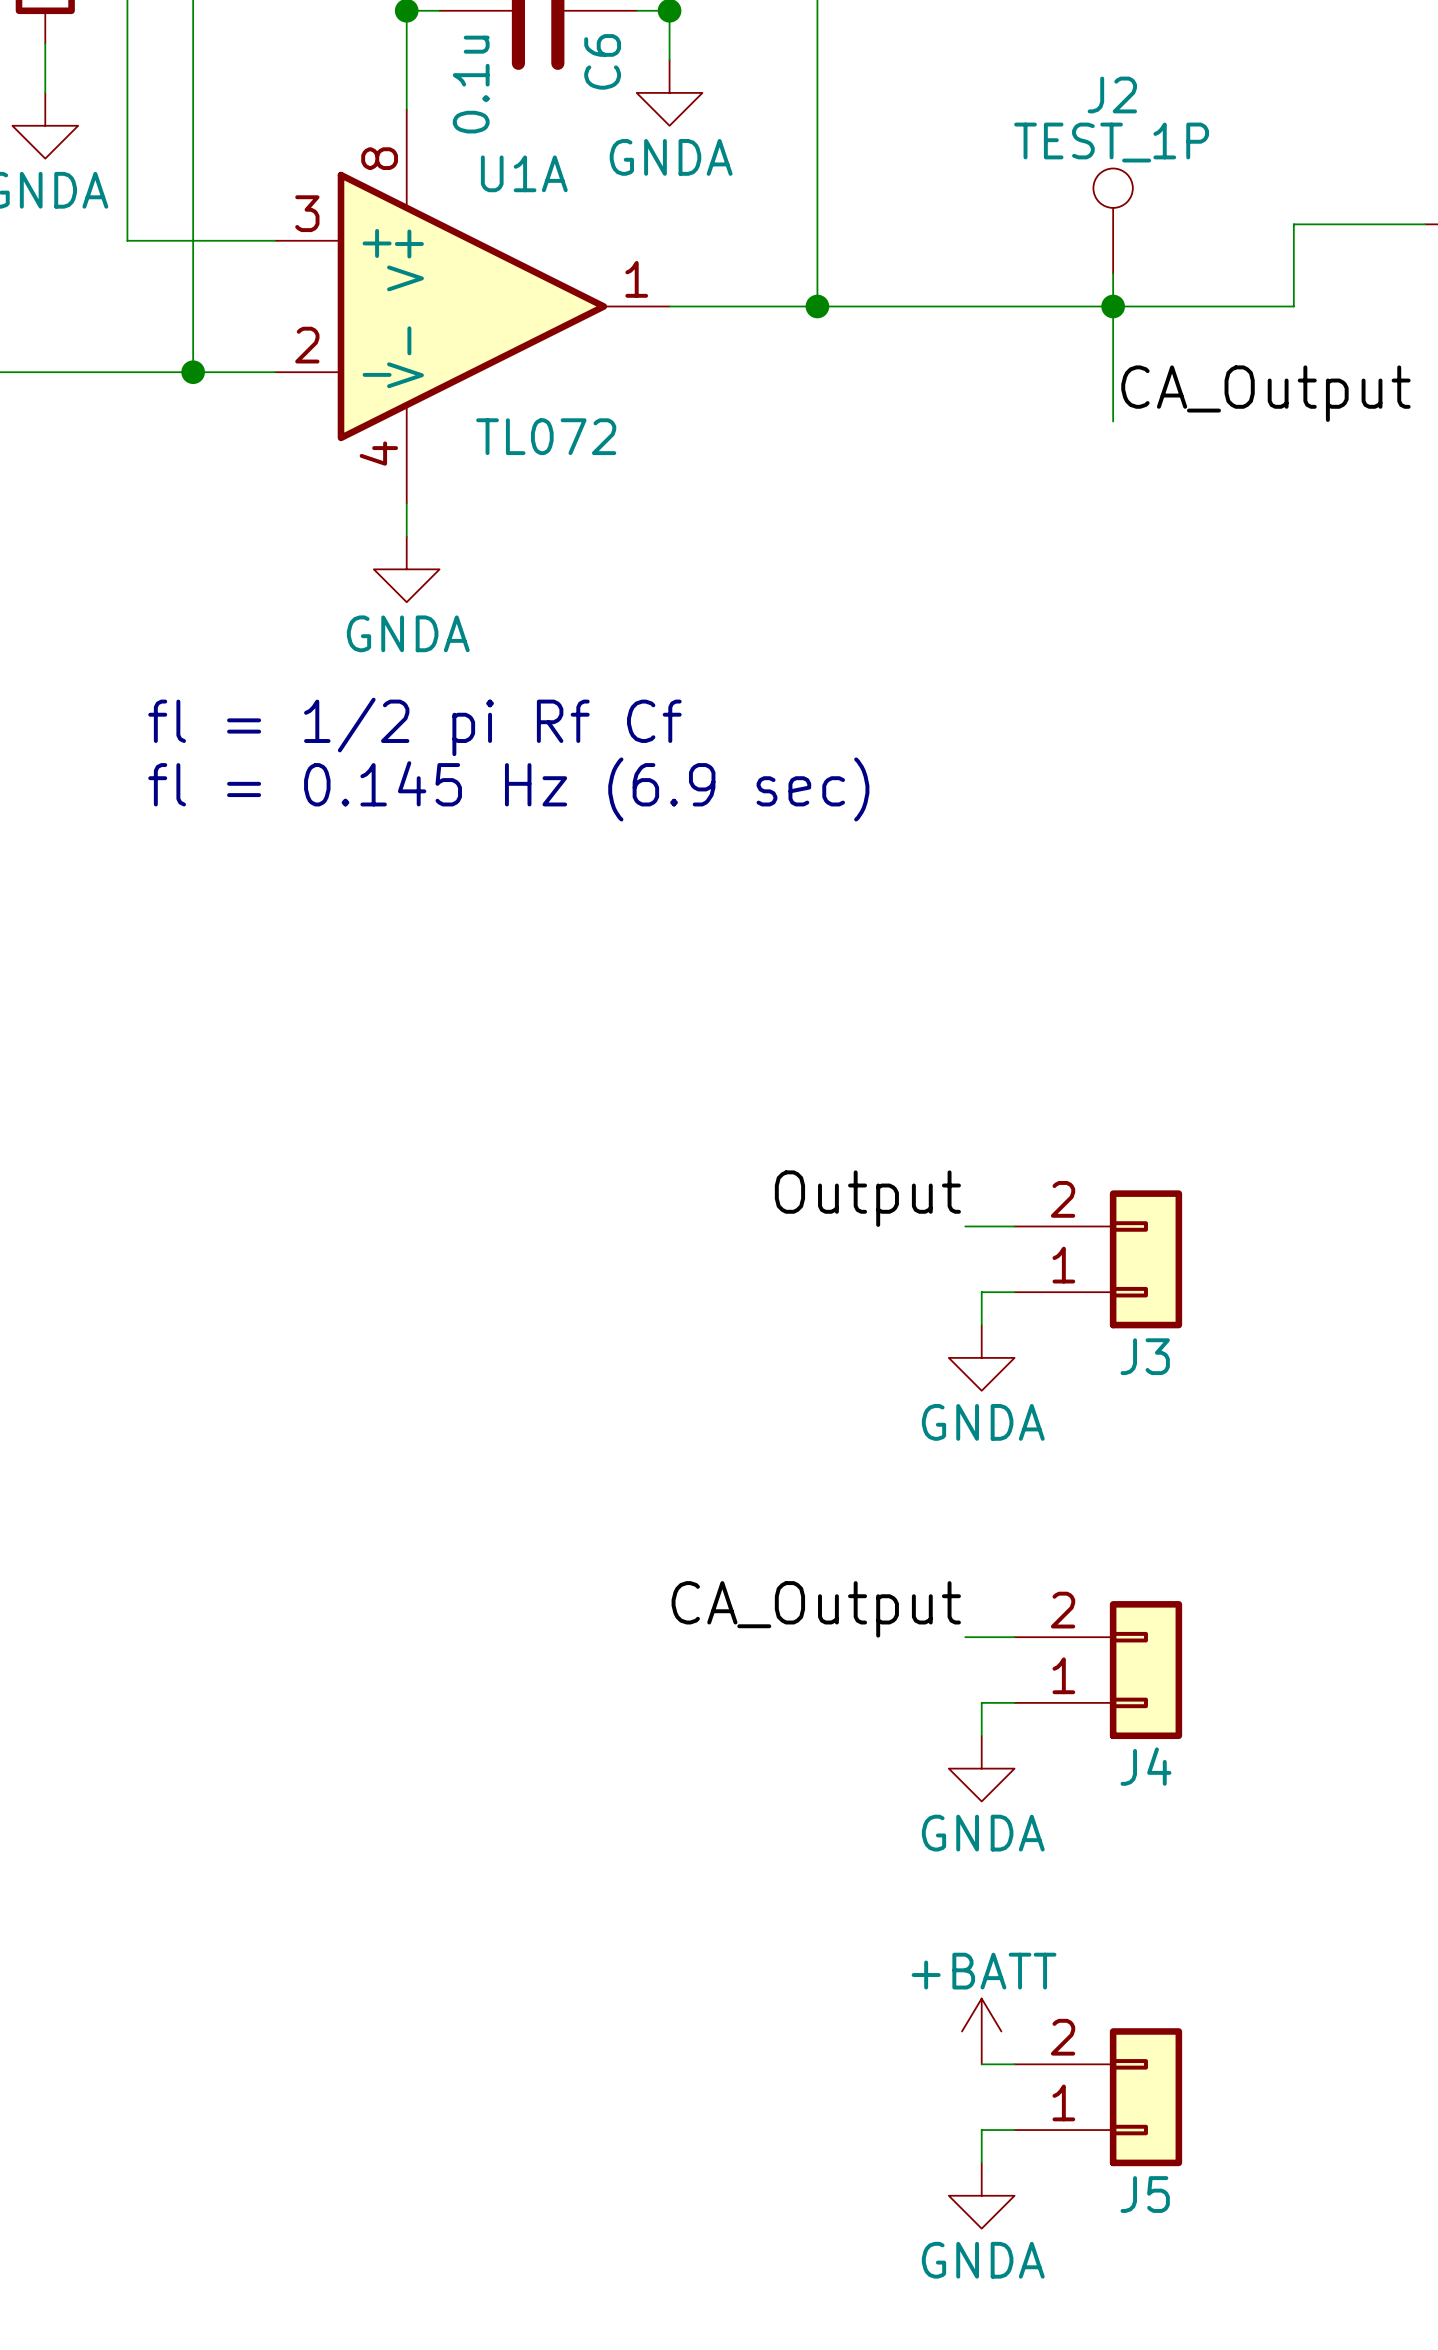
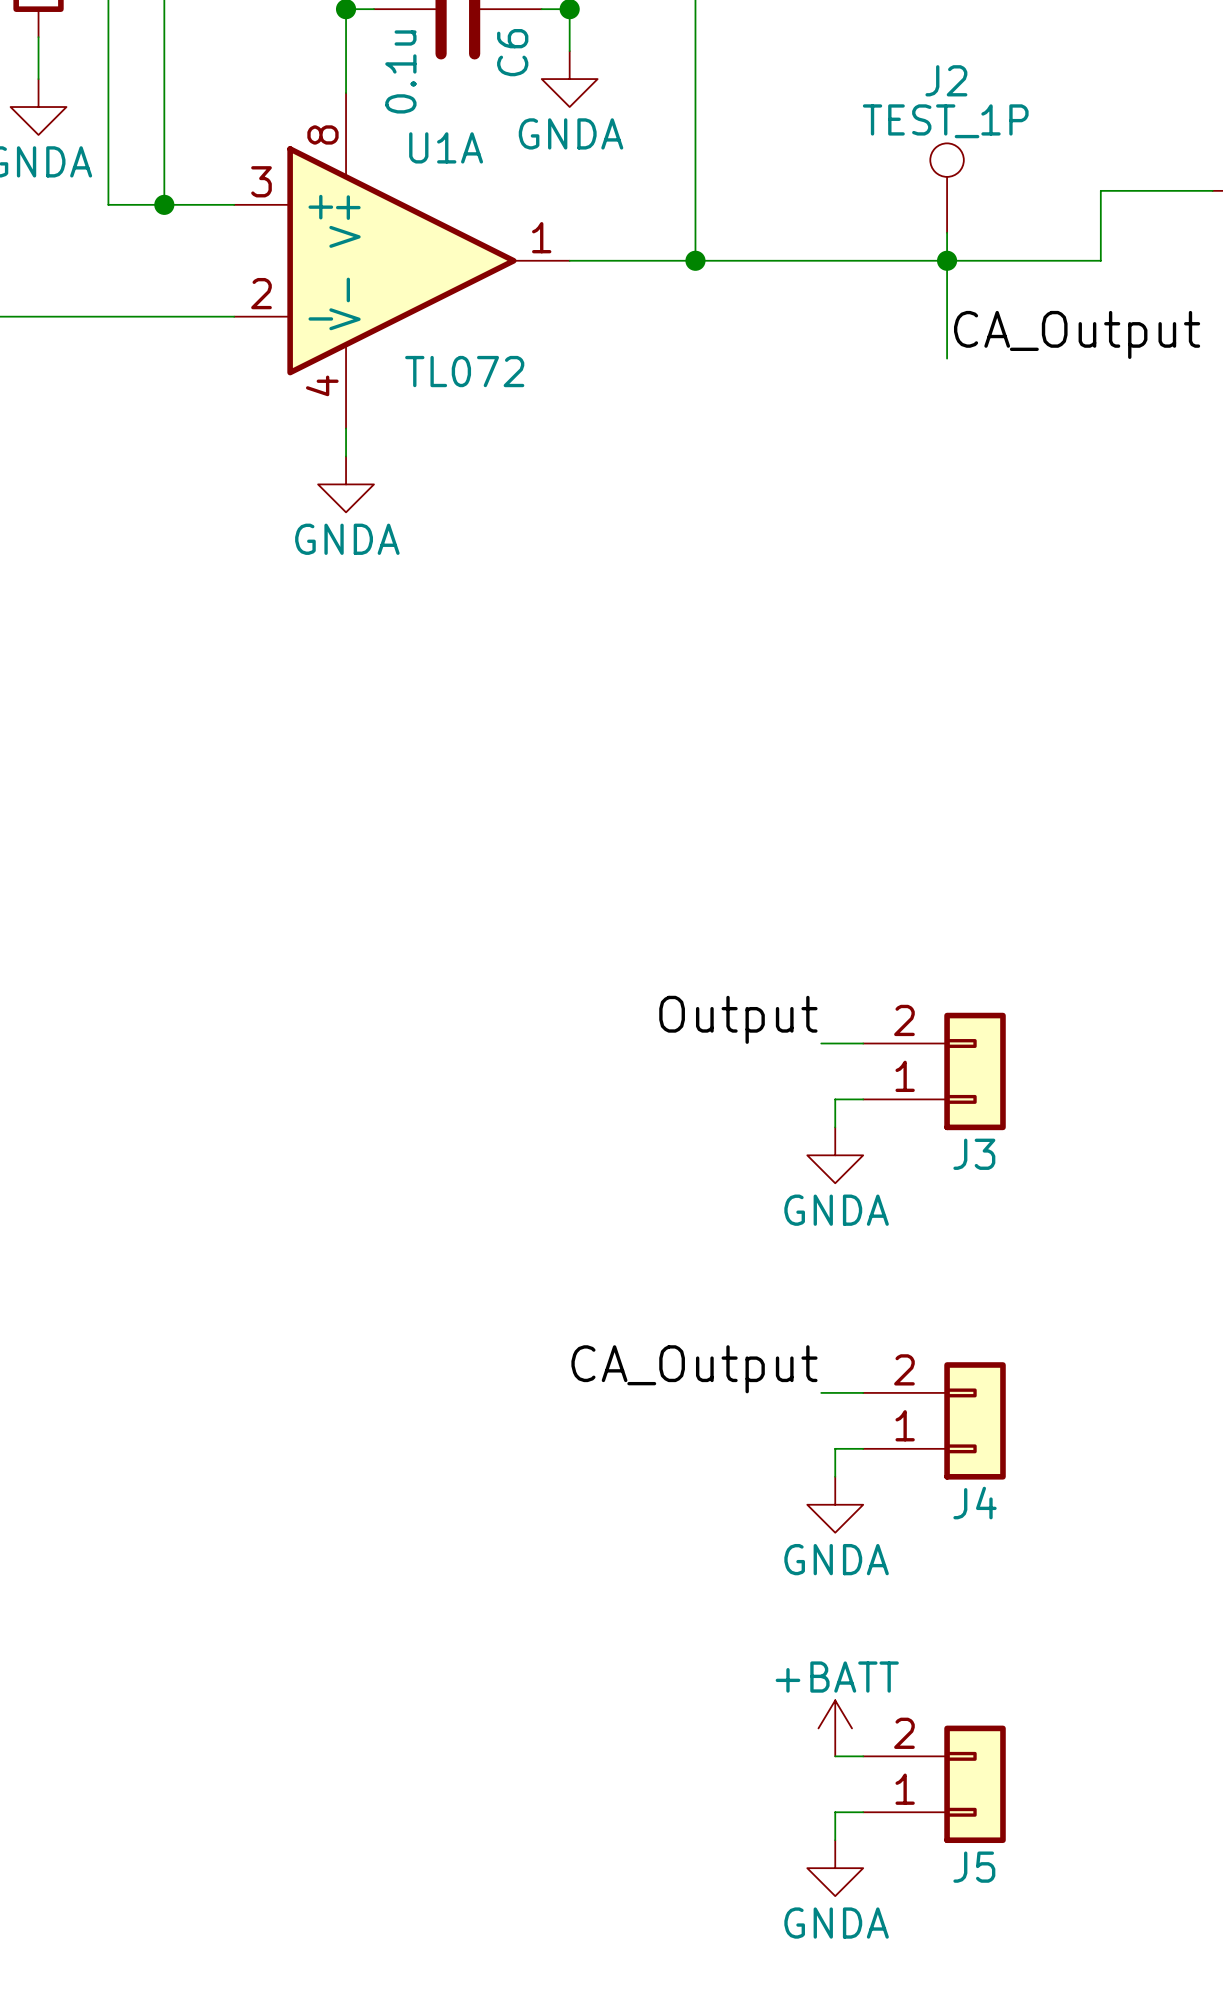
wire: (193, 240) (193, 372) -> none
junction position: (193, 372) -> (164, 204)
text: fl = 1/2 pi Rf Cf (414, 726) -> none
text: fl = 0.145 Hz (6.9 sec) (508, 789) -> none

